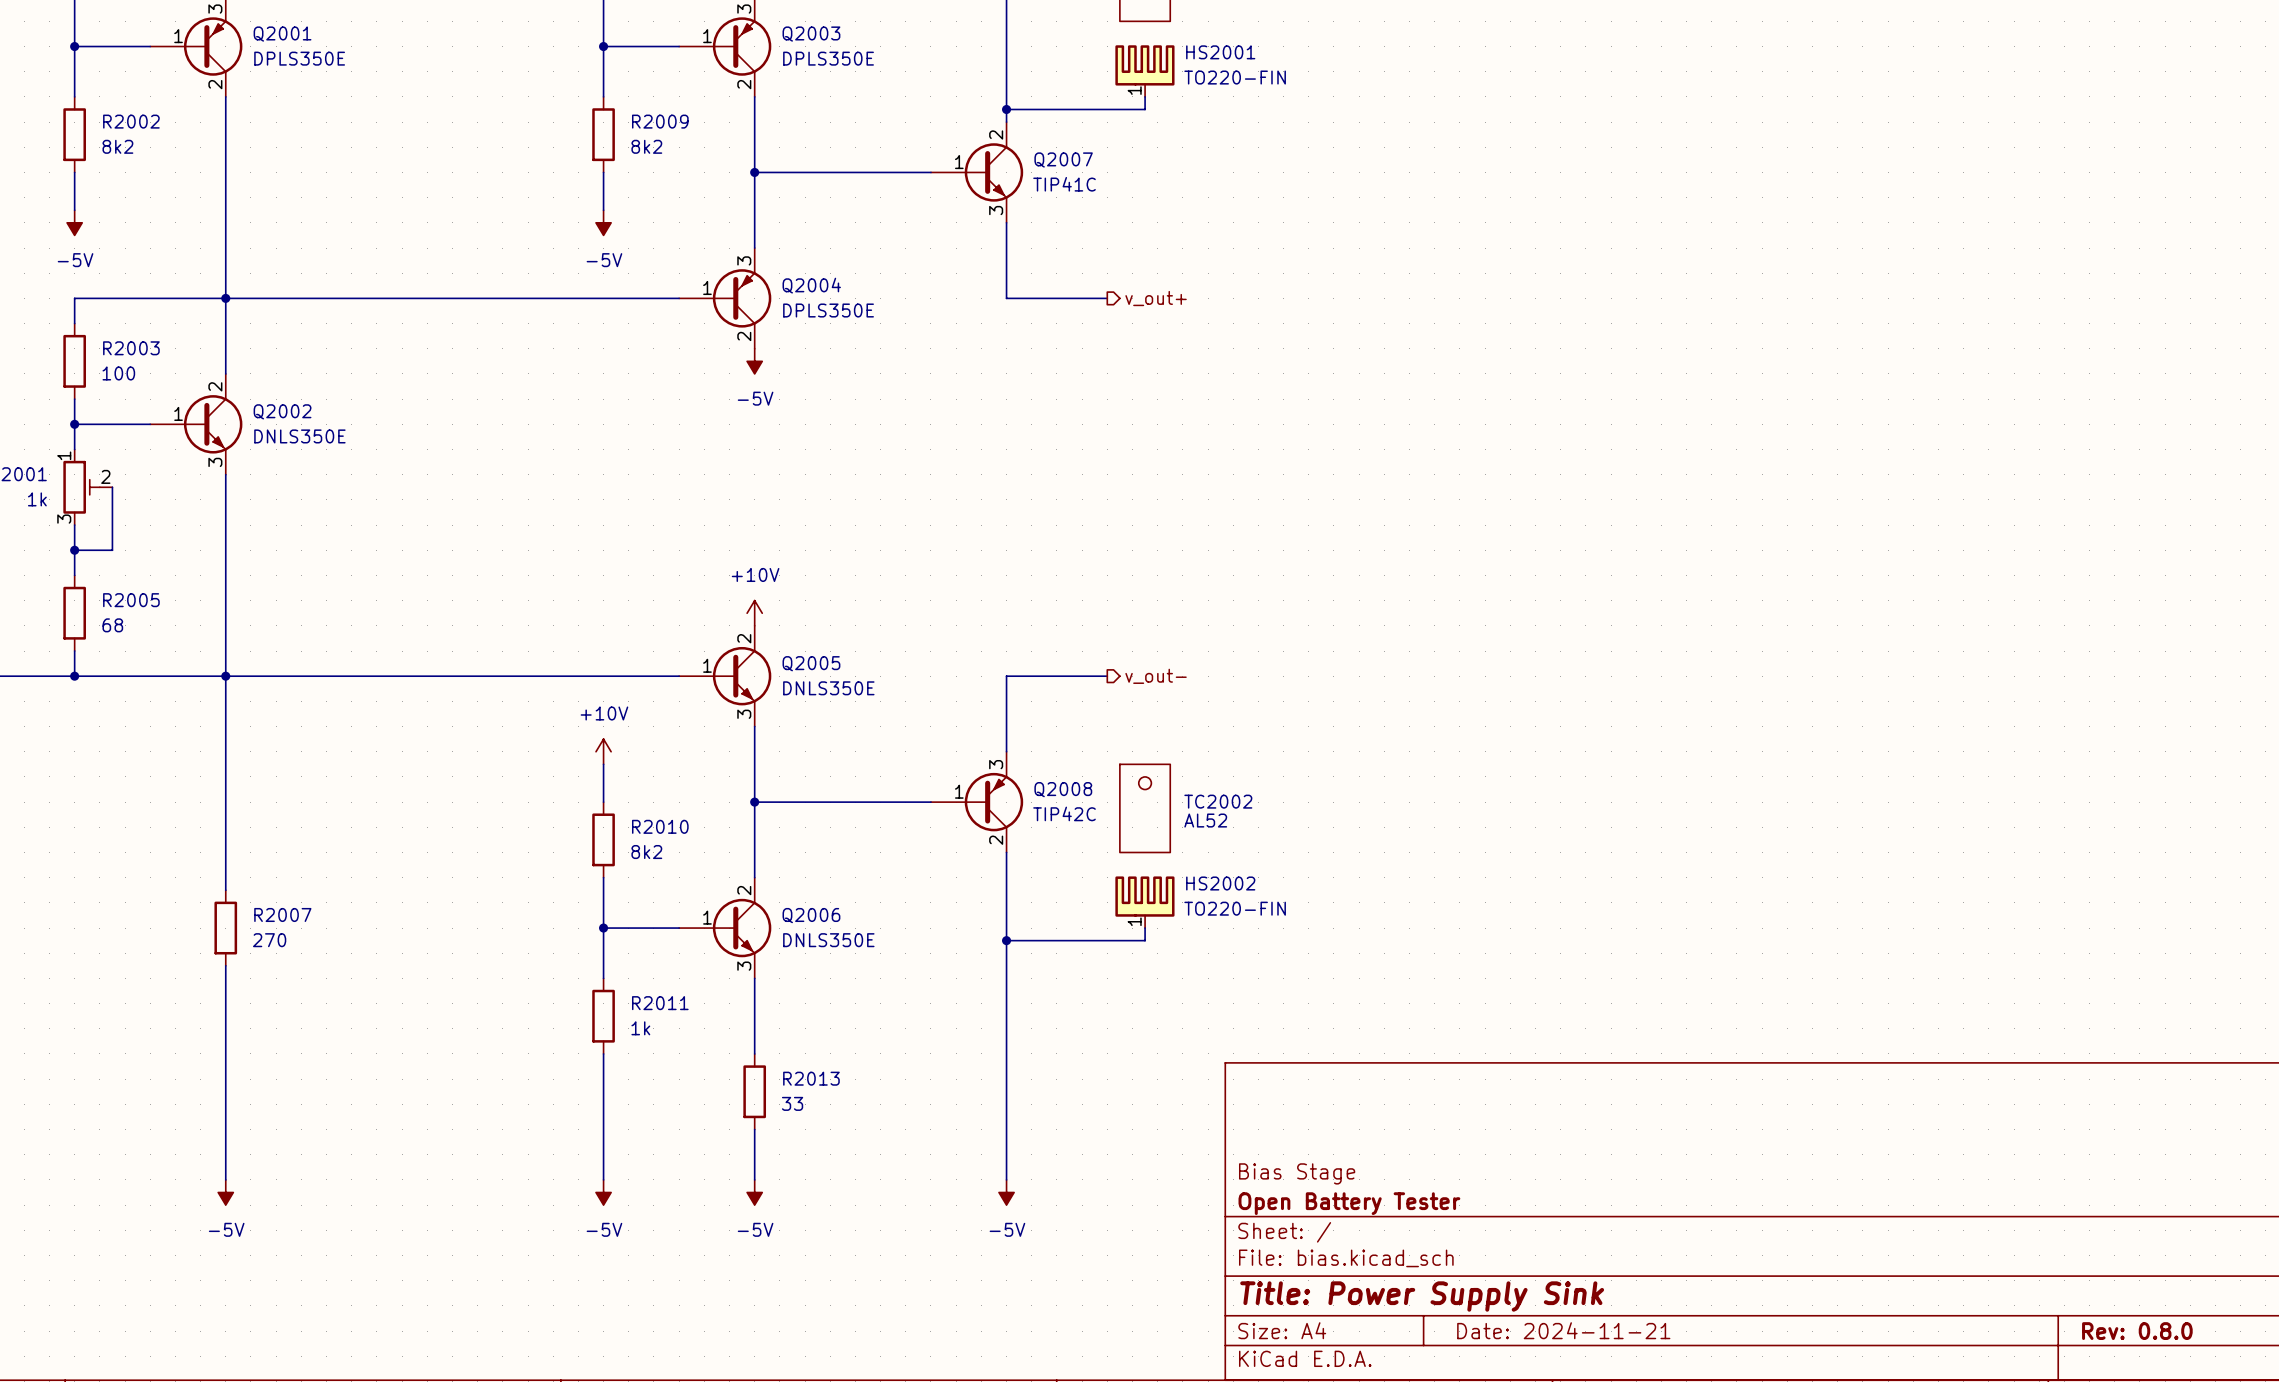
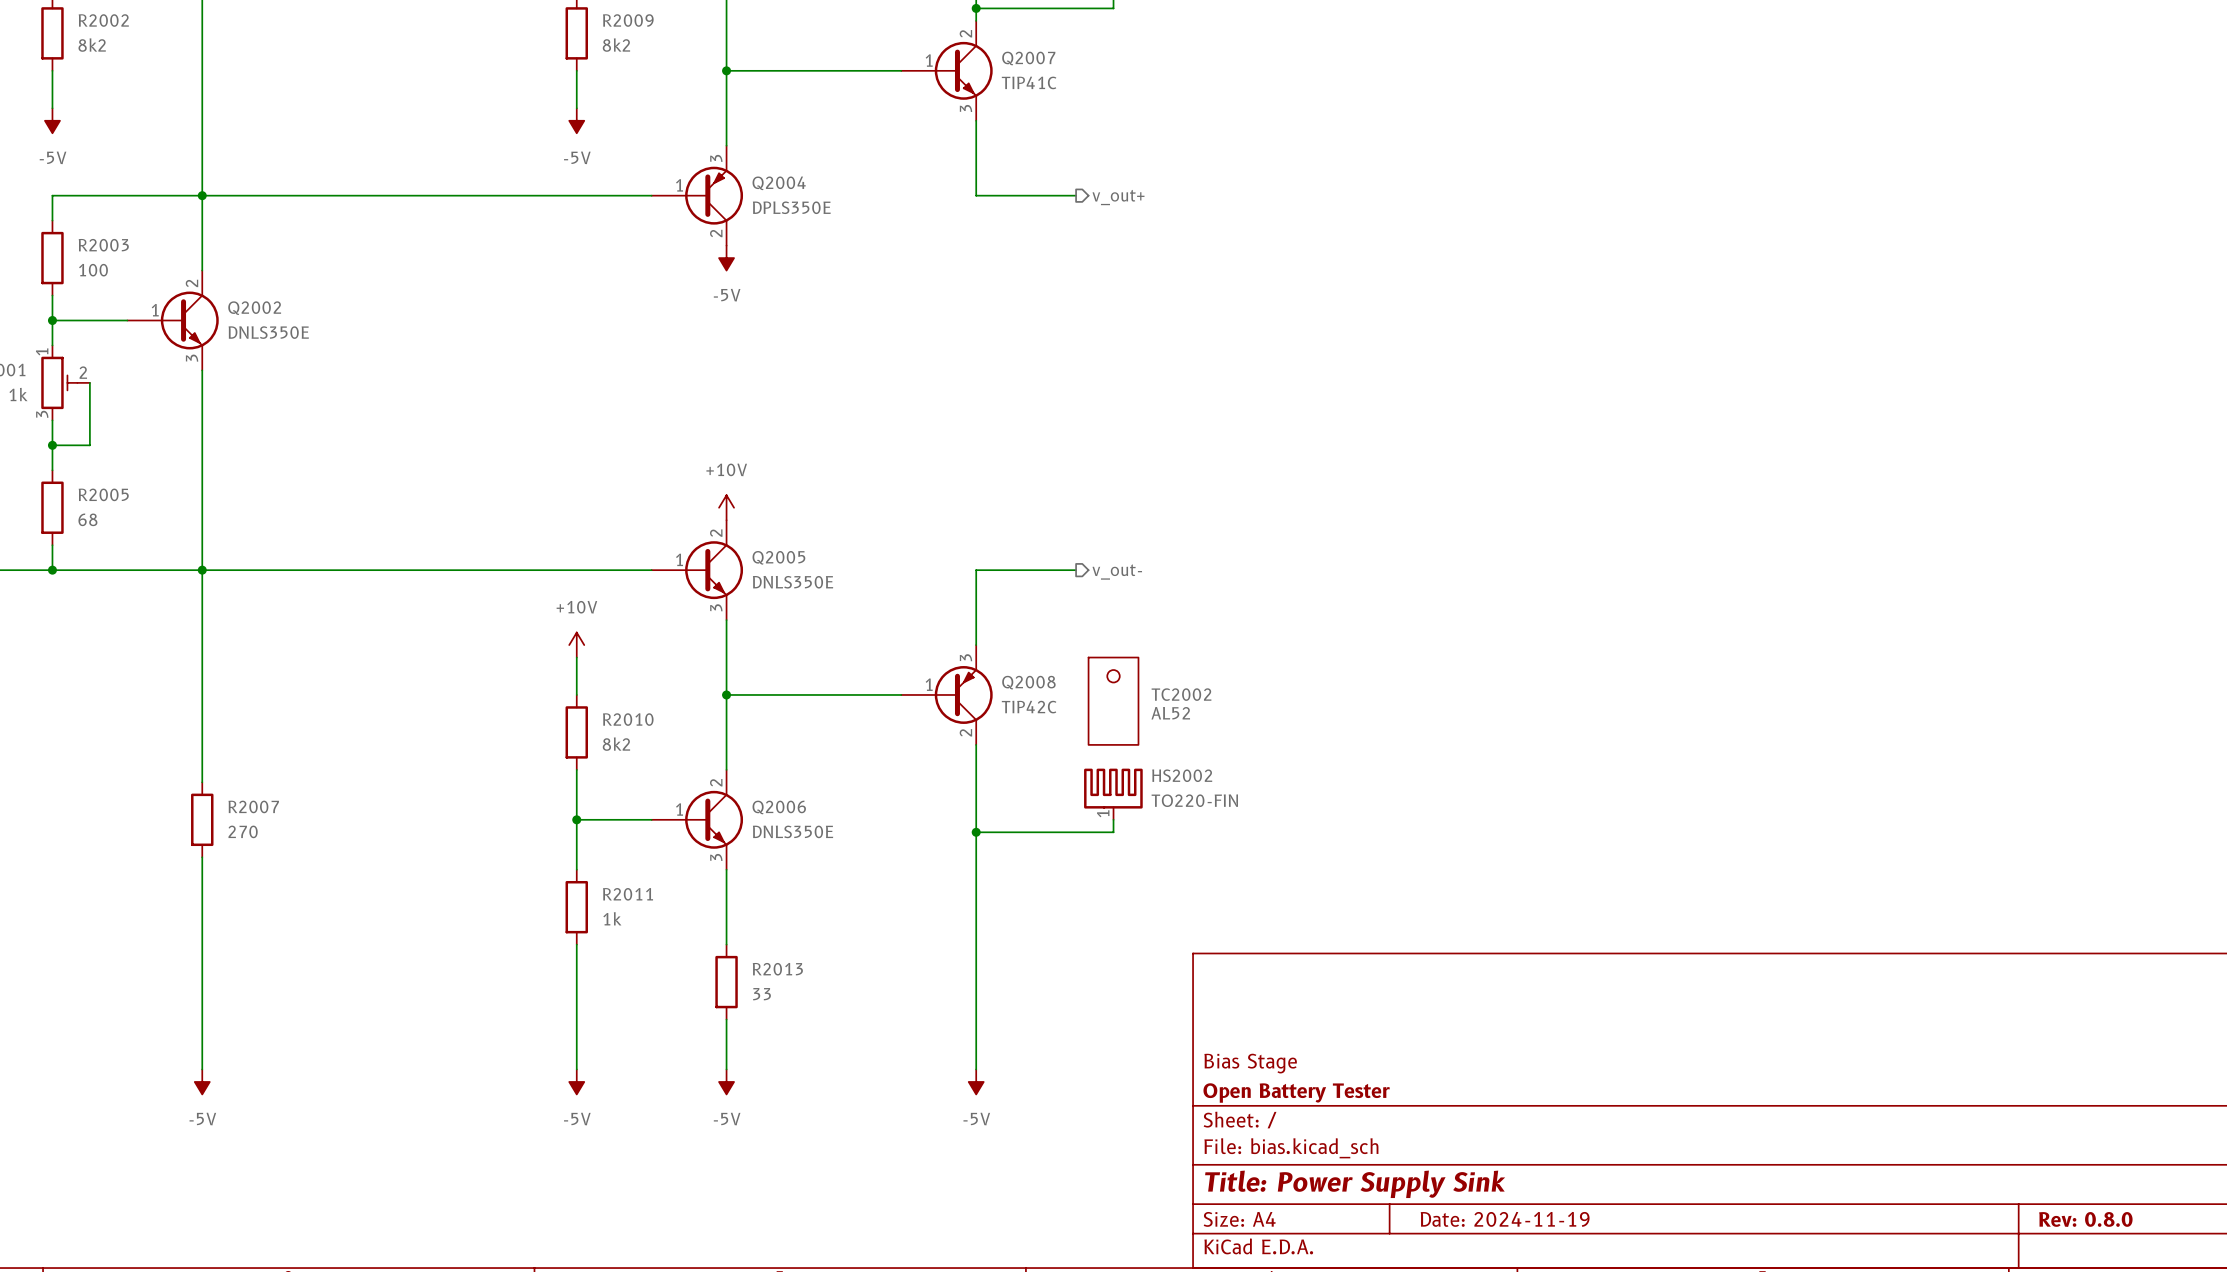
title block: Date: 2024-11-21 (1563, 1330) -> Date: 2024-11-19 (1505, 1219)

